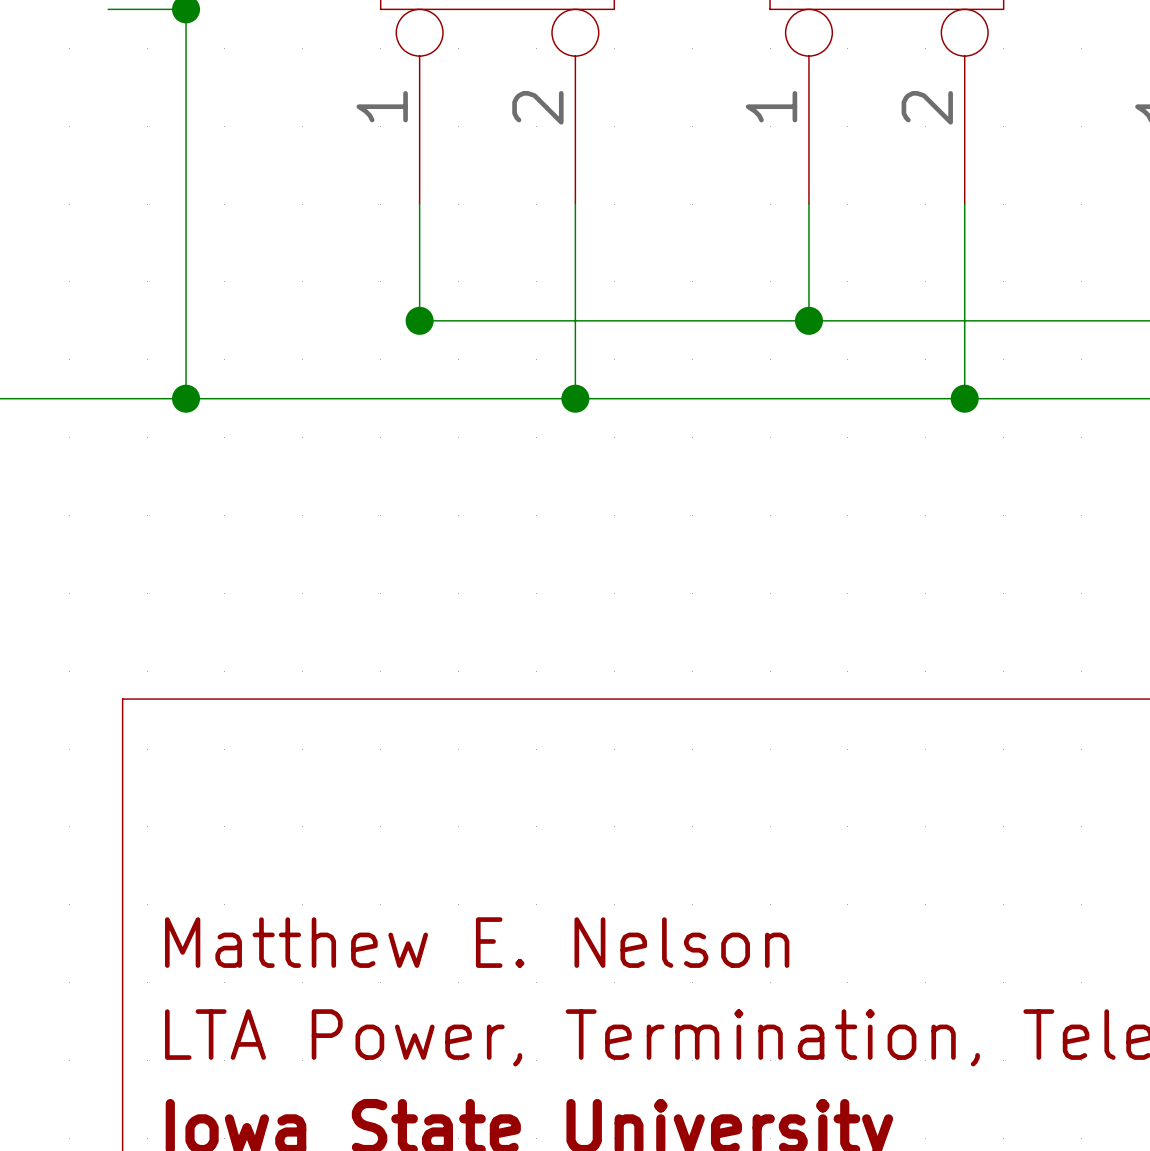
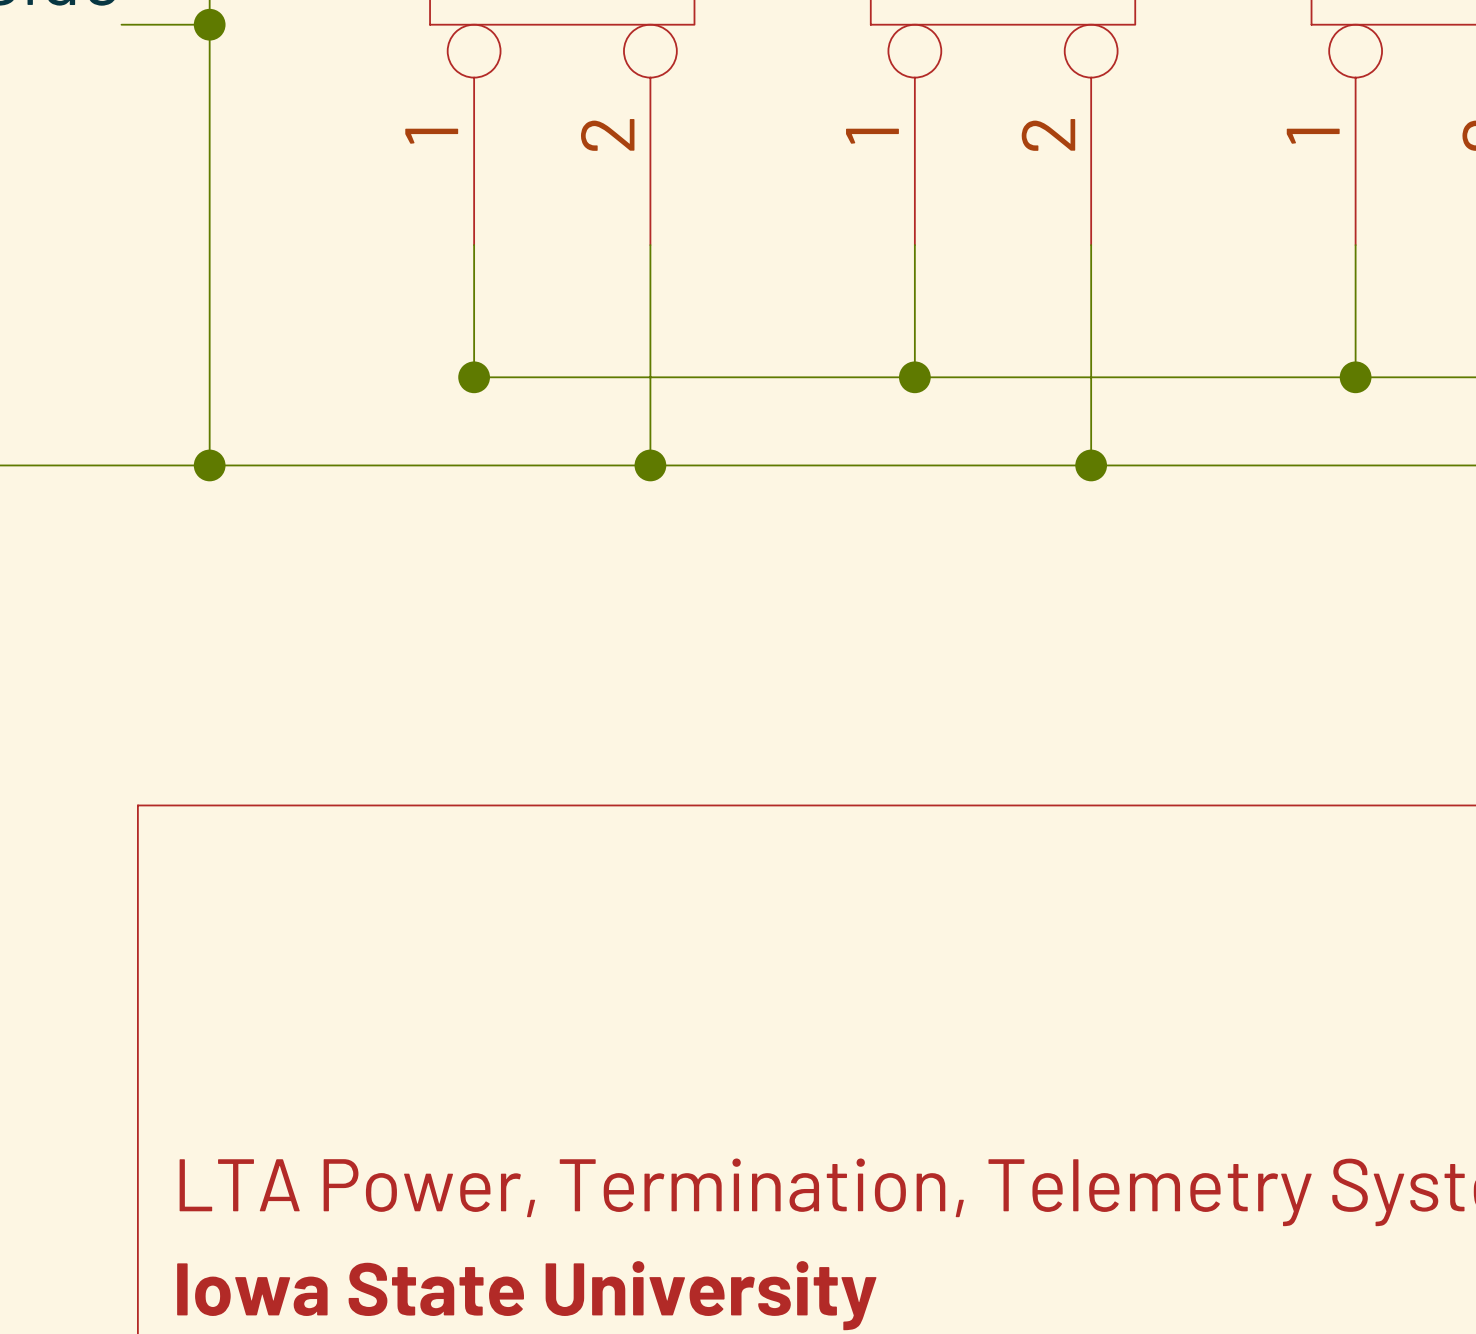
title block: Matthew E. Nelson (477, 942) -> none

